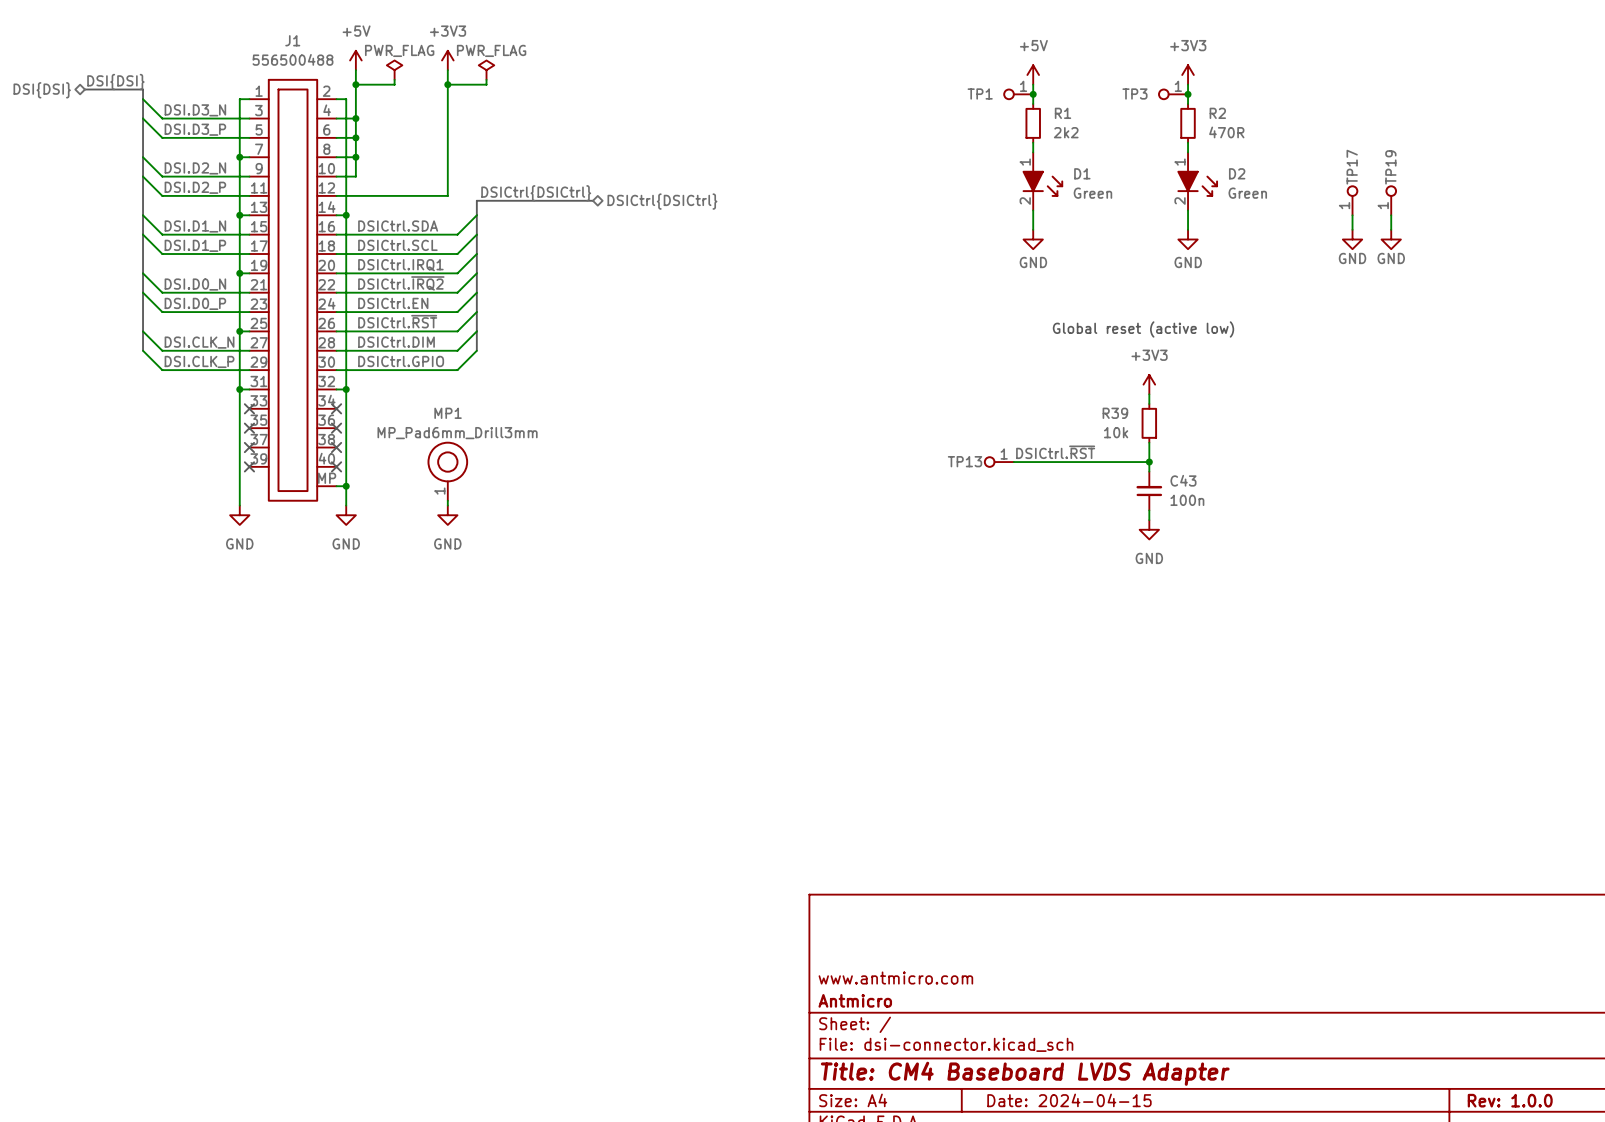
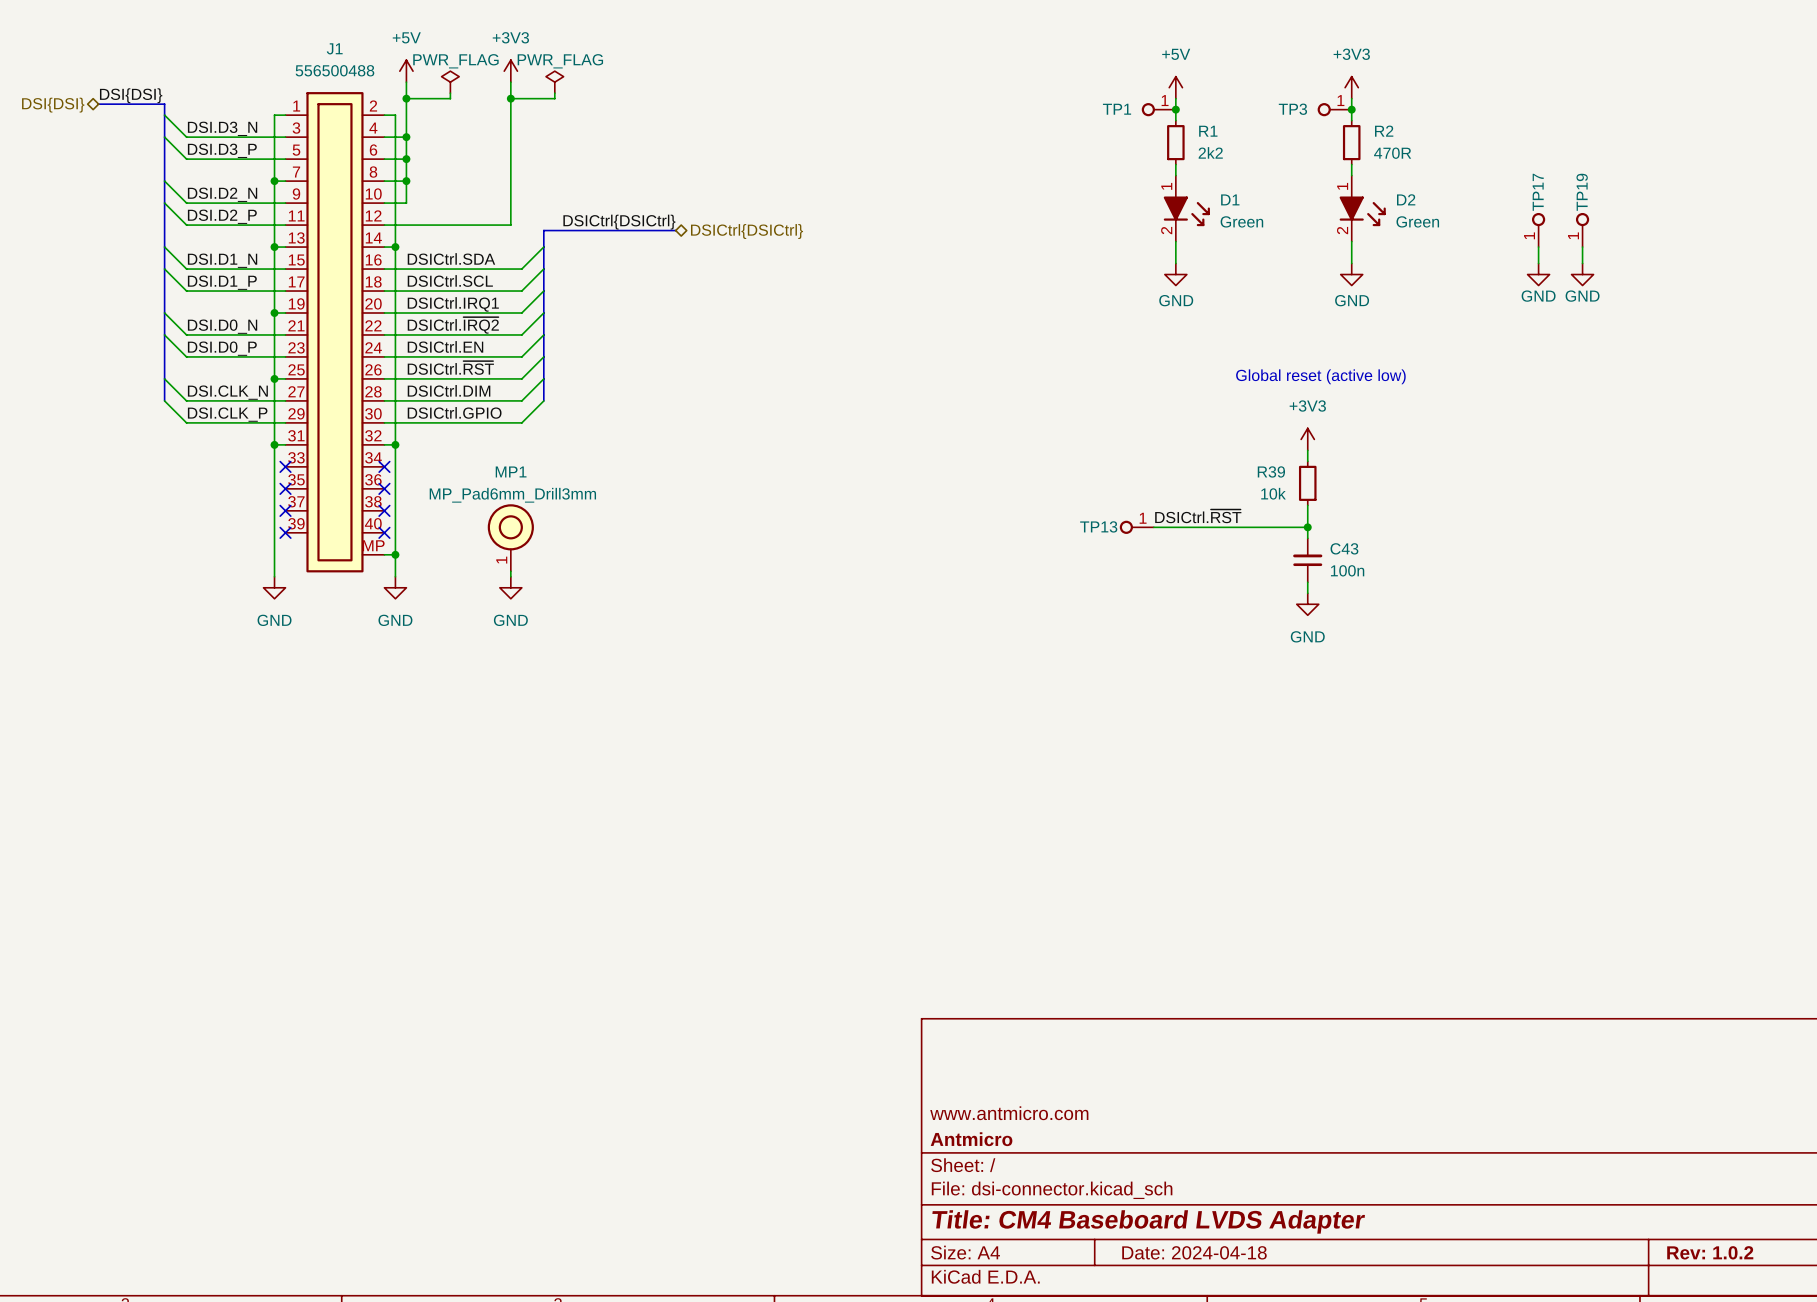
title block: Date: 2024-04-15 (1069, 1100) -> Date: 2024-04-18 (1194, 1252)
title block: Rev: 1.0.0 (1510, 1100) -> Rev: 1.0.2 (1710, 1252)

